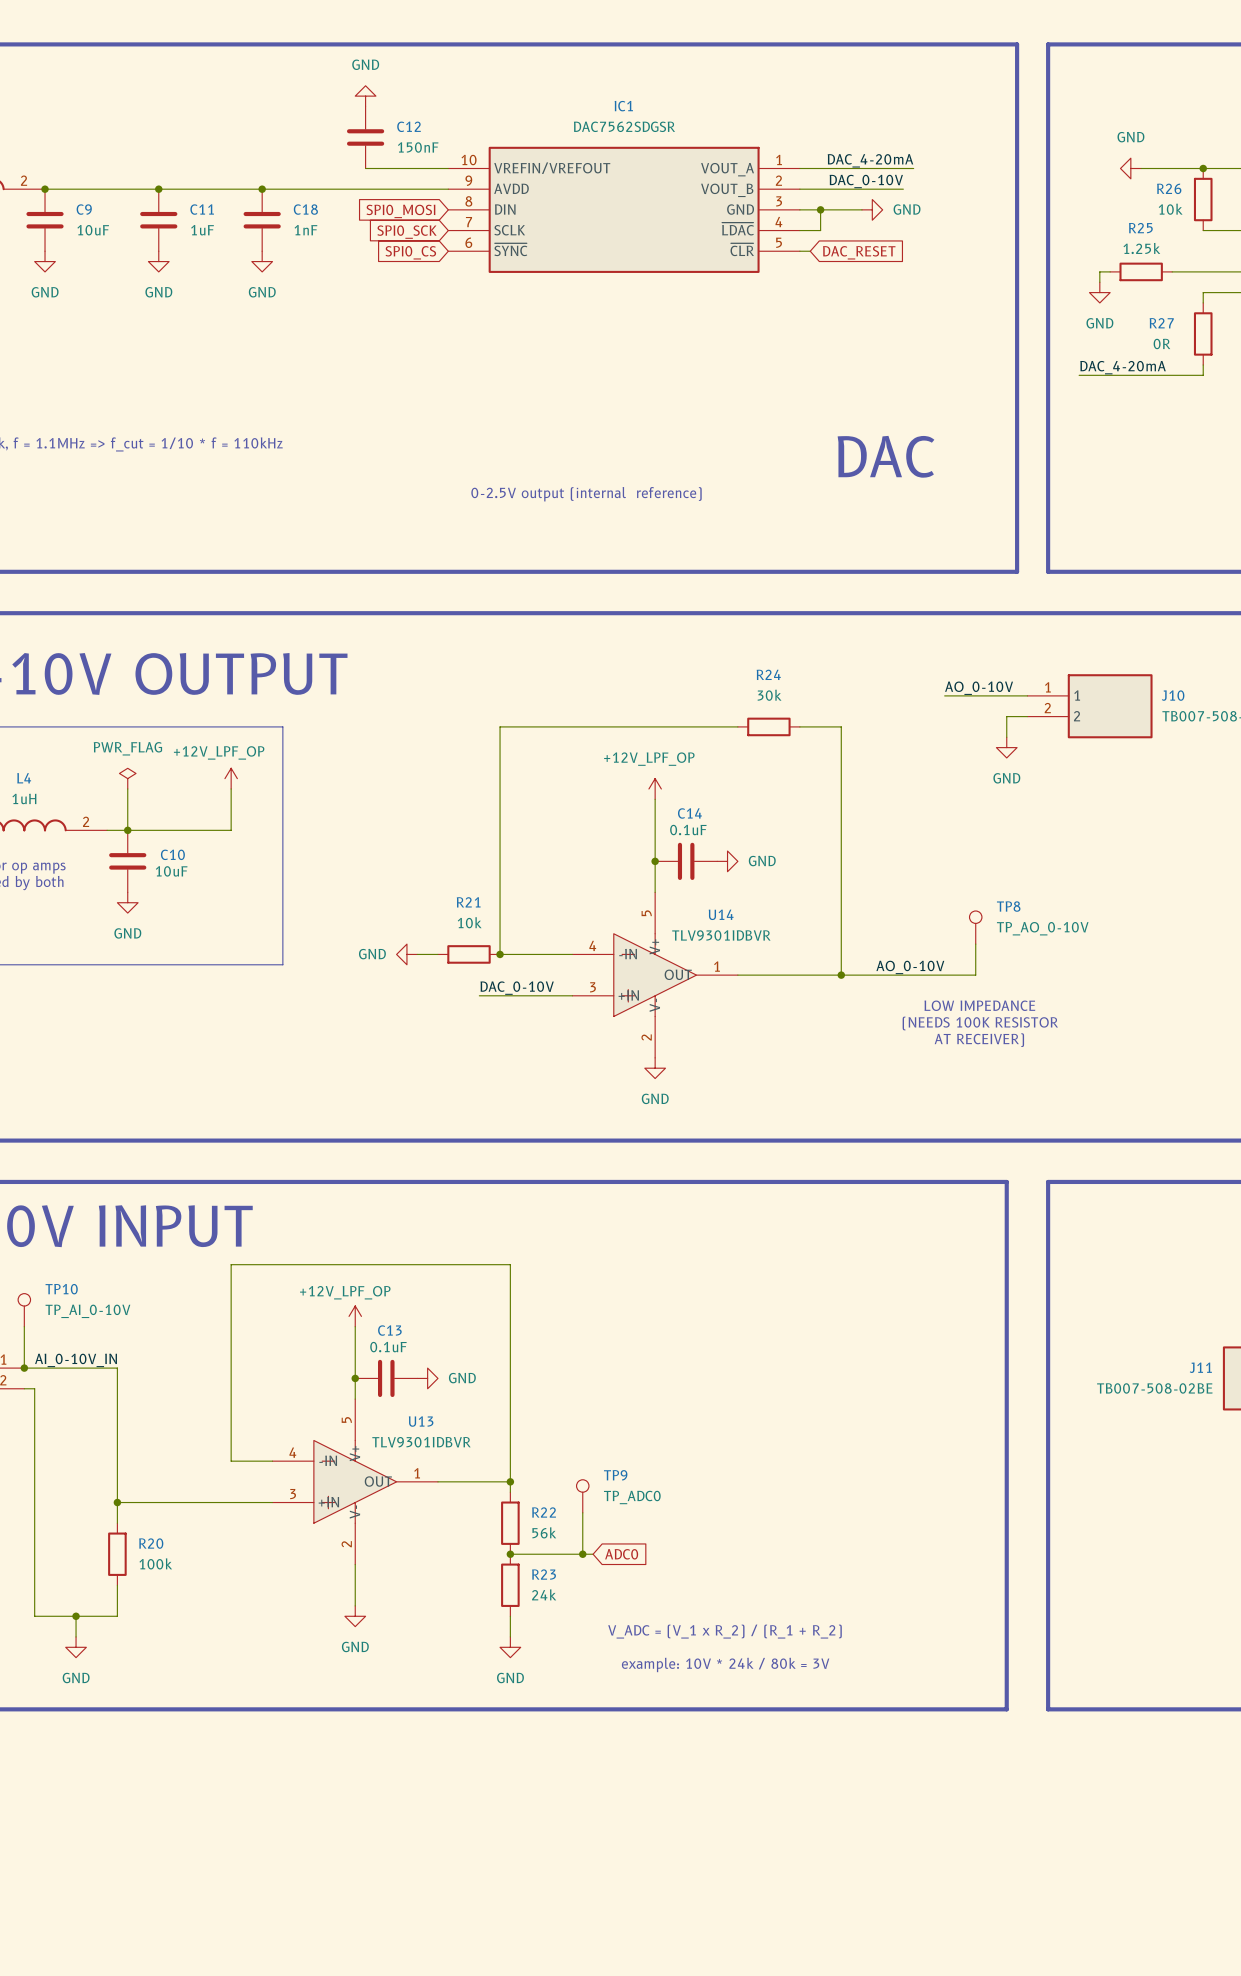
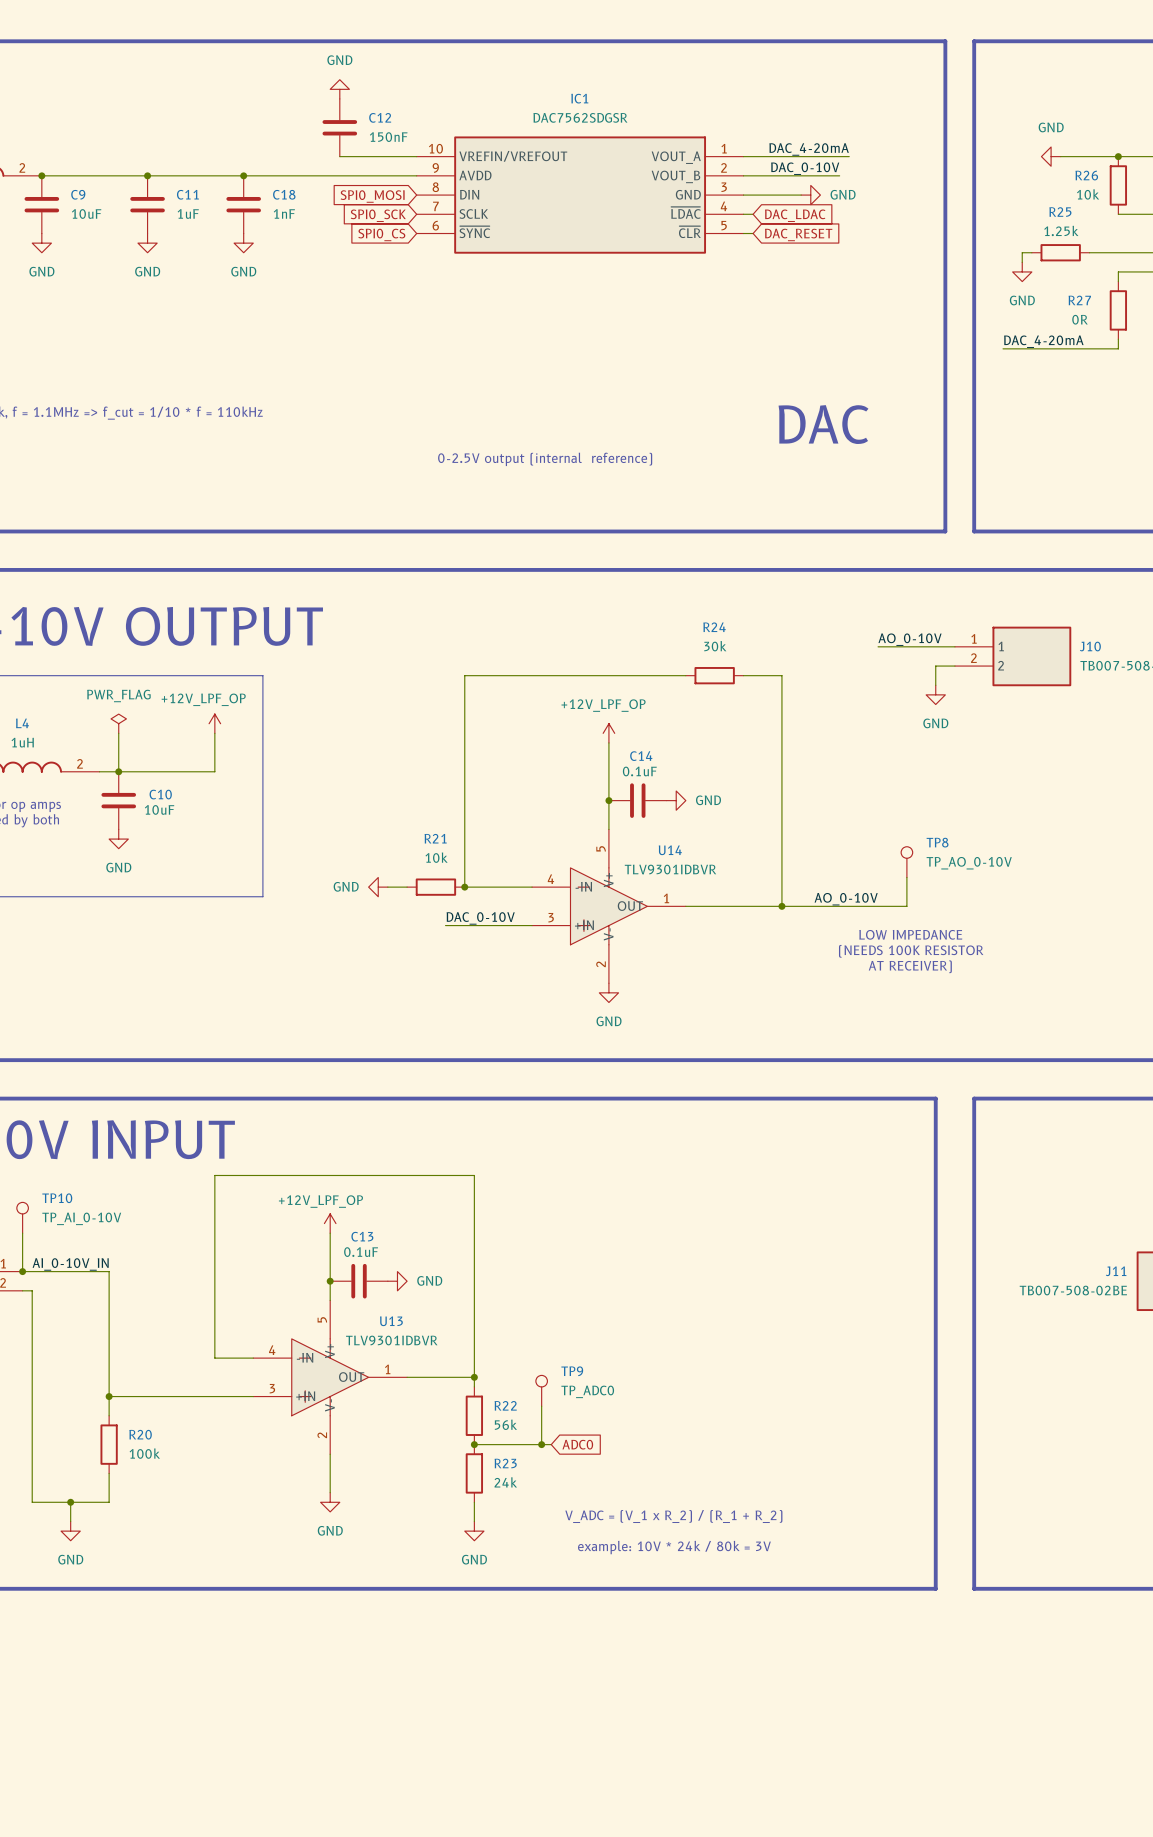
wire: (820, 209) (820, 230) (810, 230) -> none
junction: (820, 209) -> none
global label: none -> DAC_LDAC (795, 215)

